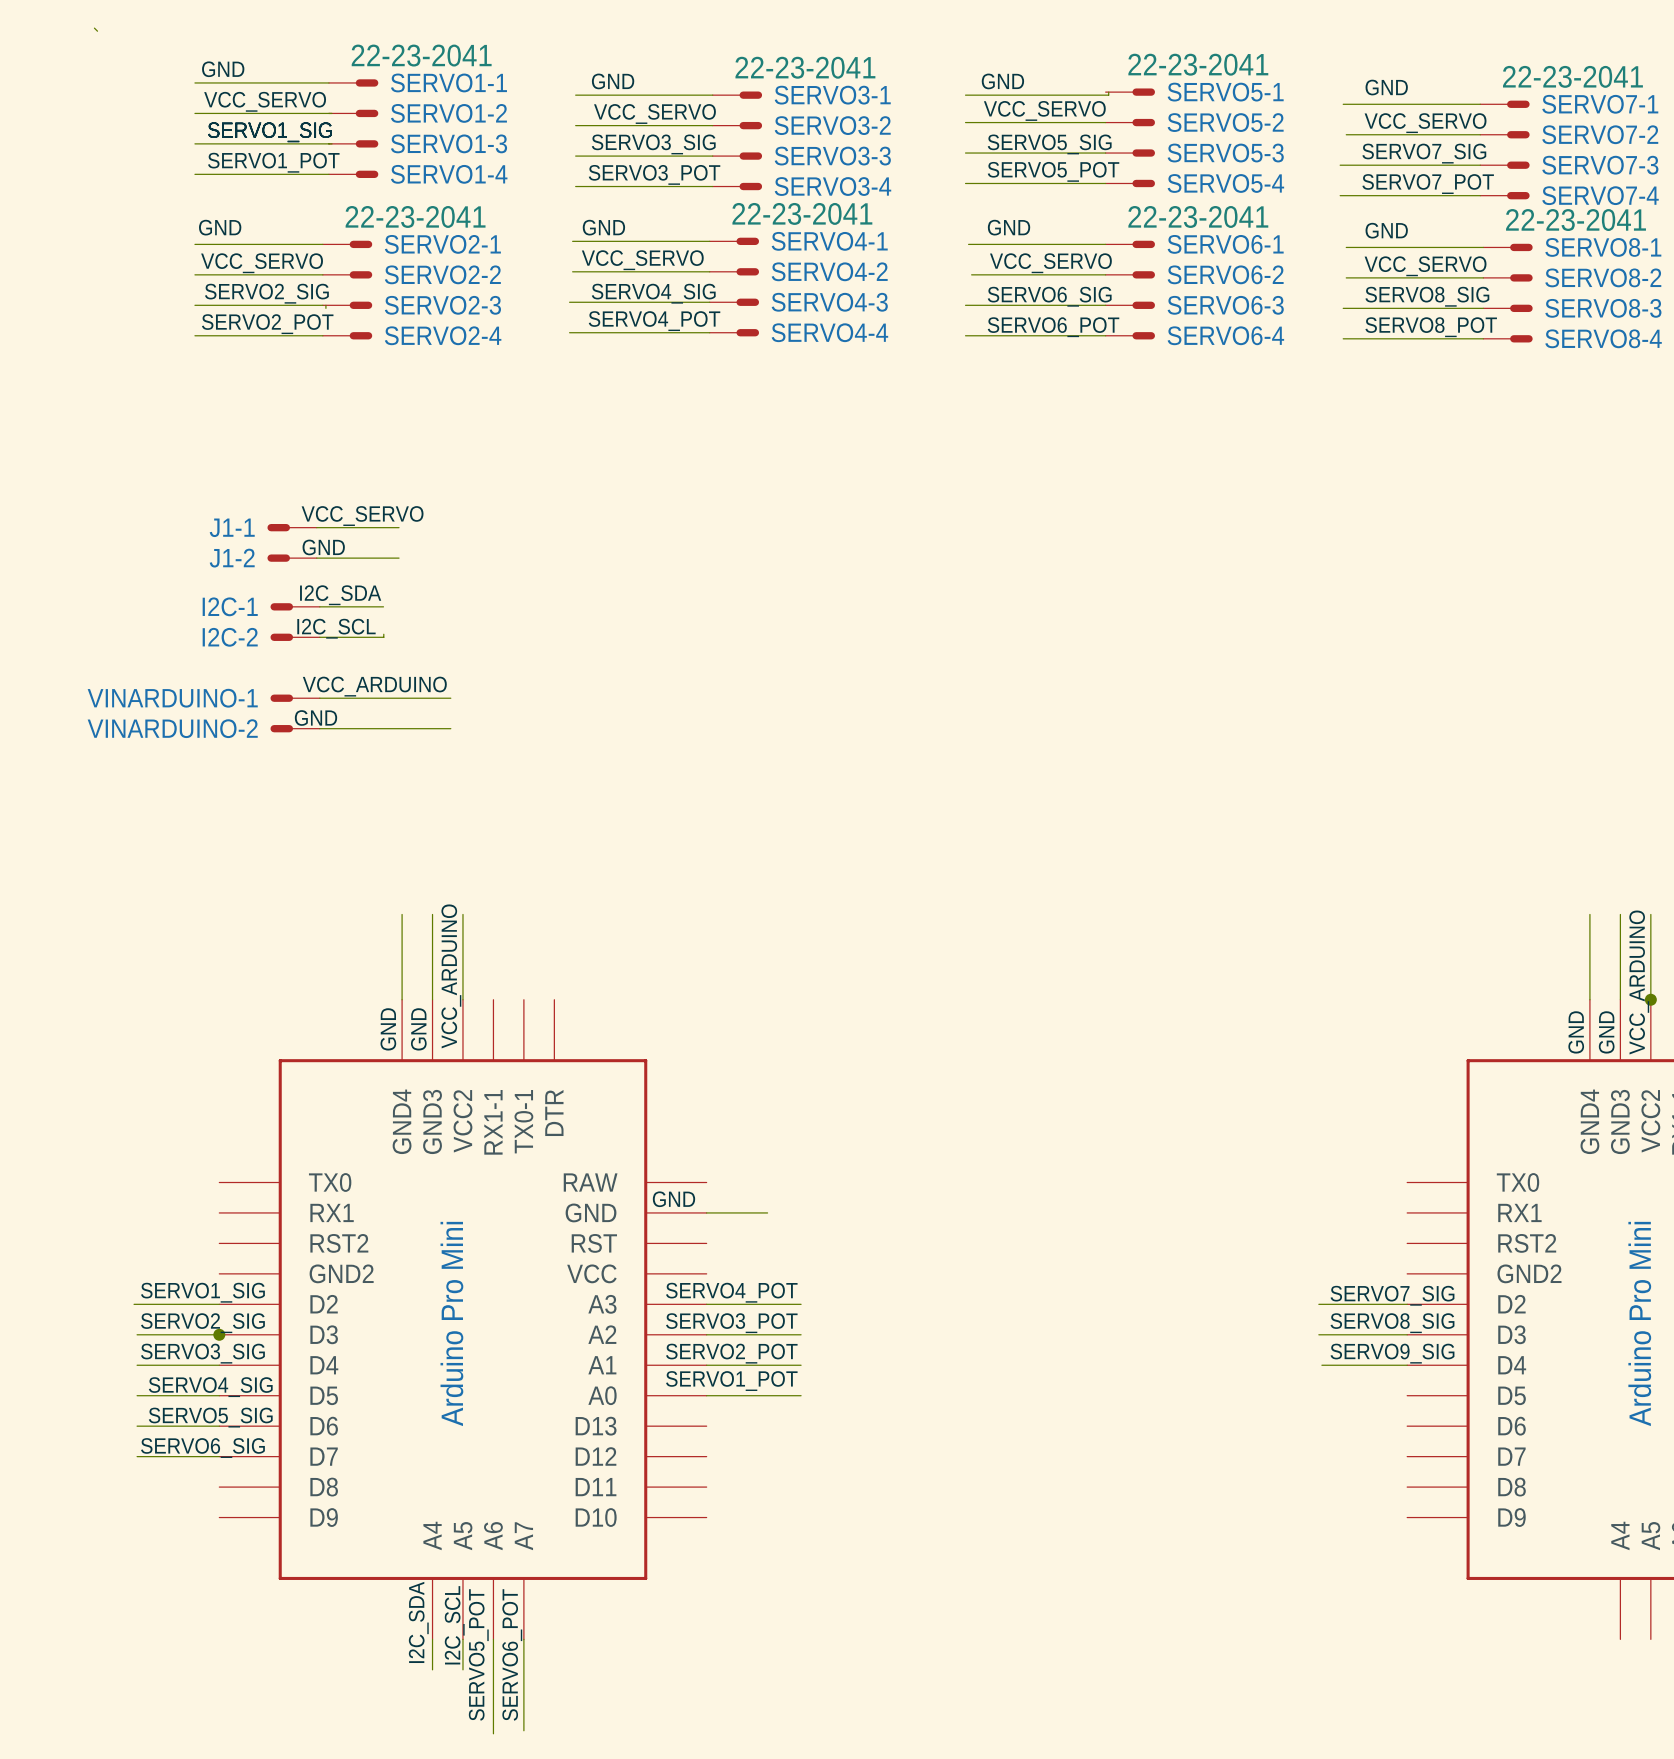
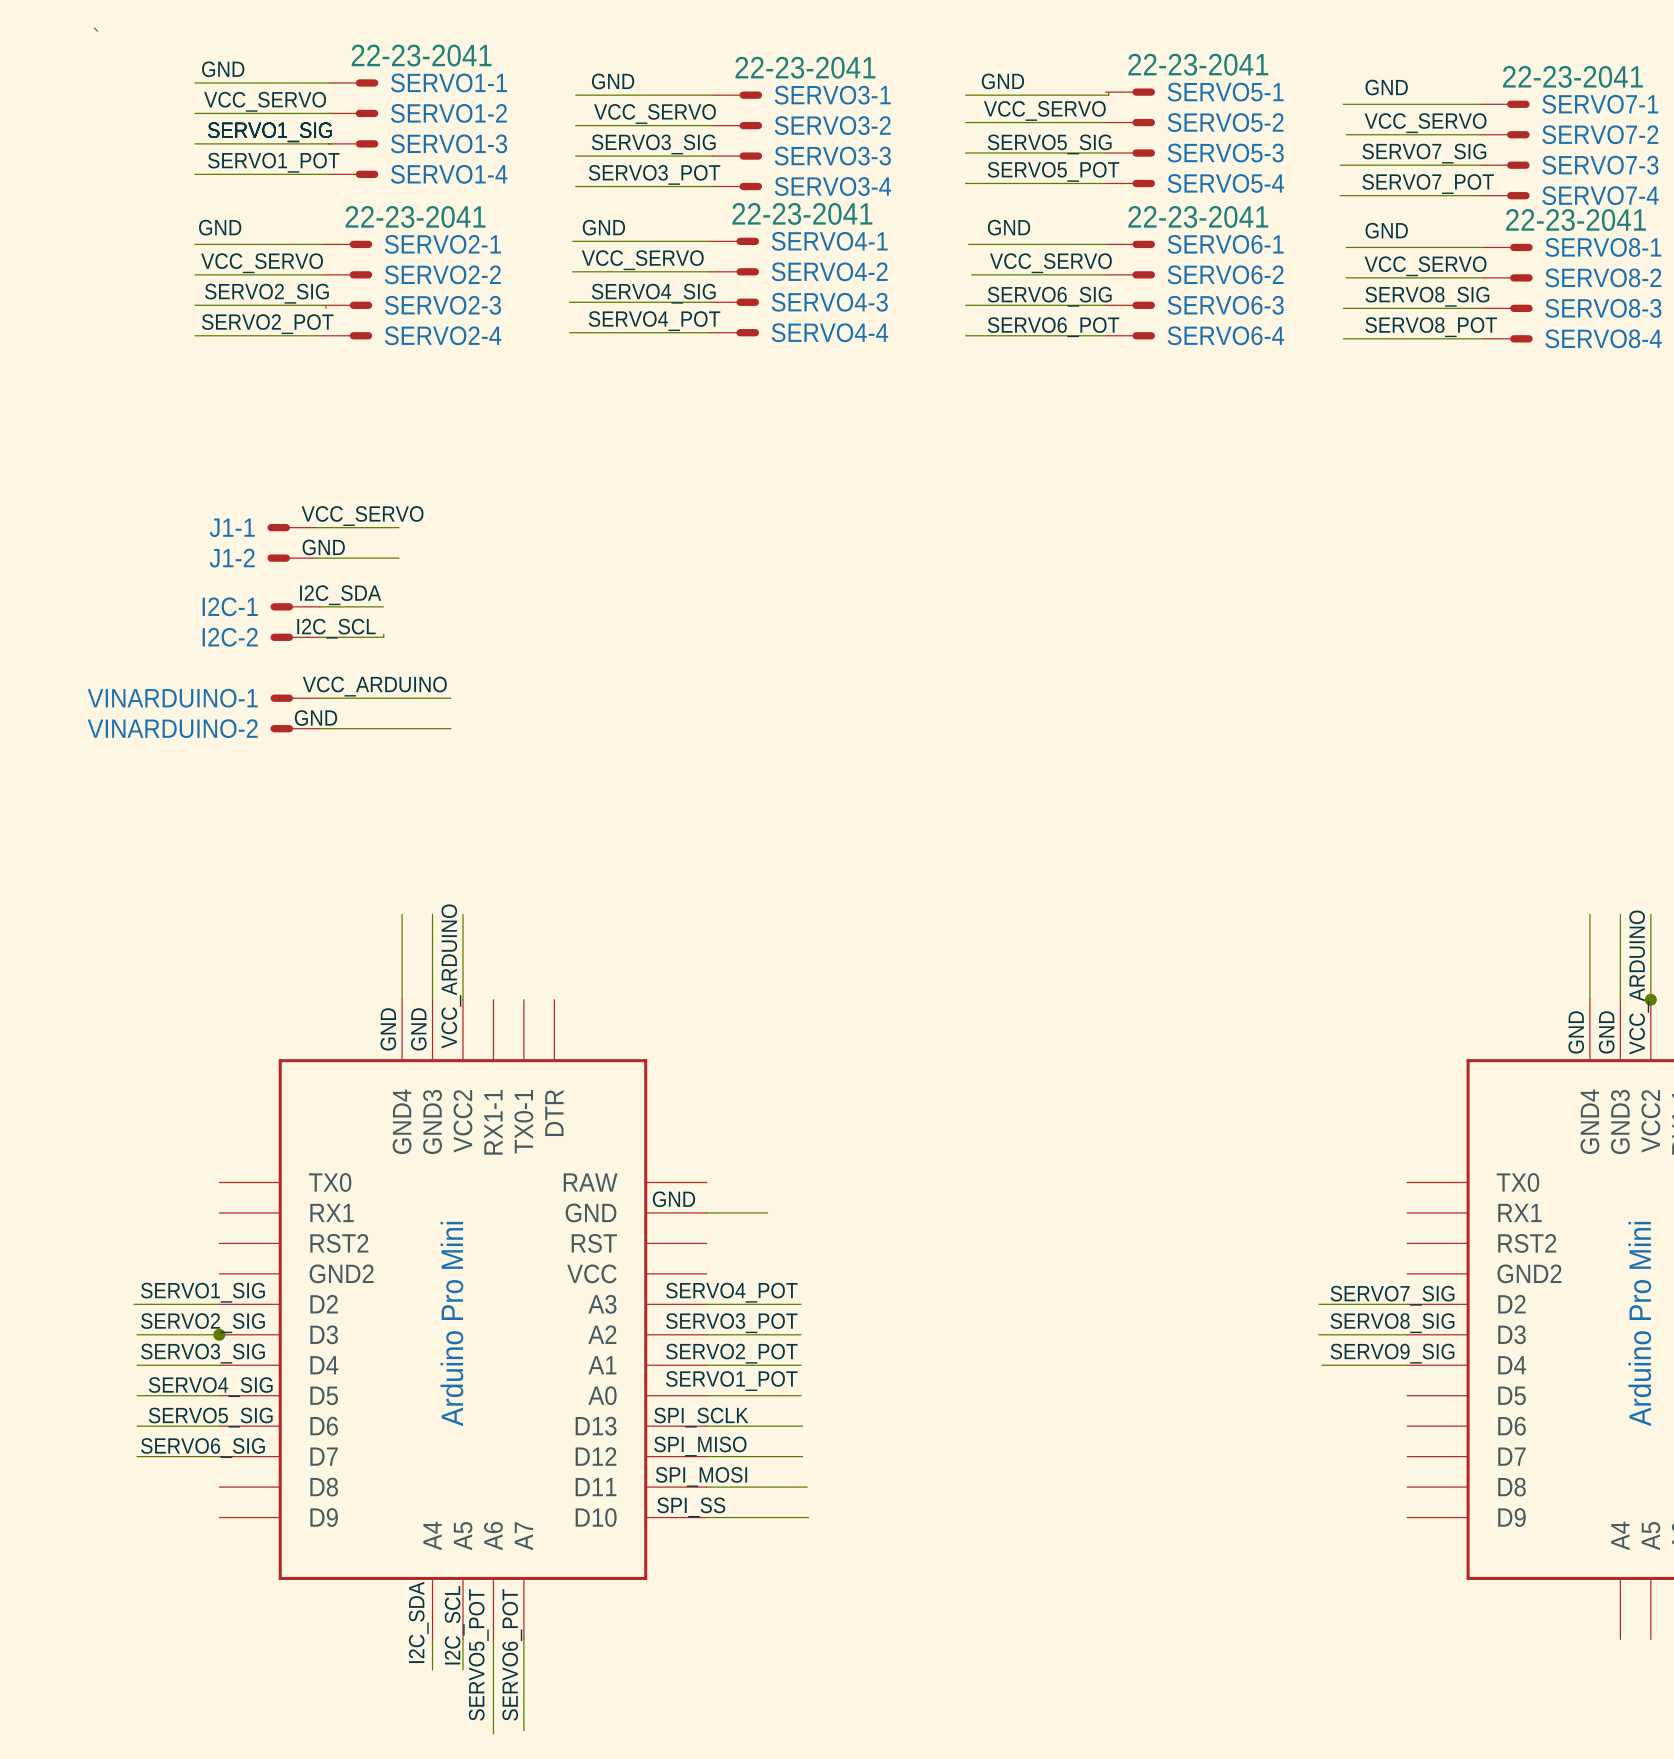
label: none -> SPI_SCLK (701, 1417)
wire: none -> (706, 1426) (802, 1426)
label: none -> SPI_MISO (700, 1446)
wire: none -> (706, 1456) (802, 1456)
label: none -> SPI_MOSI (701, 1476)
wire: none -> (706, 1487) (807, 1487)
label: none -> SPI_SS (691, 1507)
wire: none -> (706, 1517) (808, 1517)

